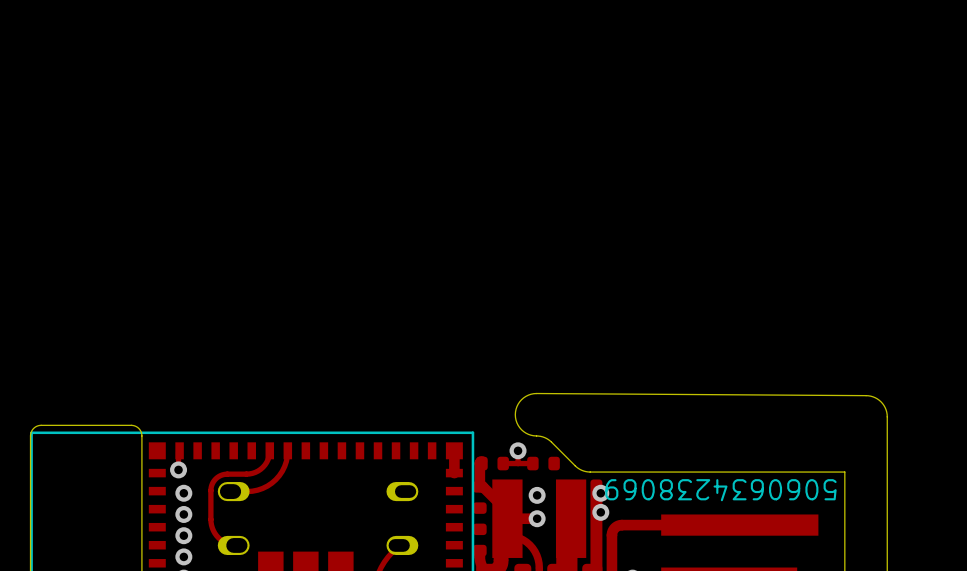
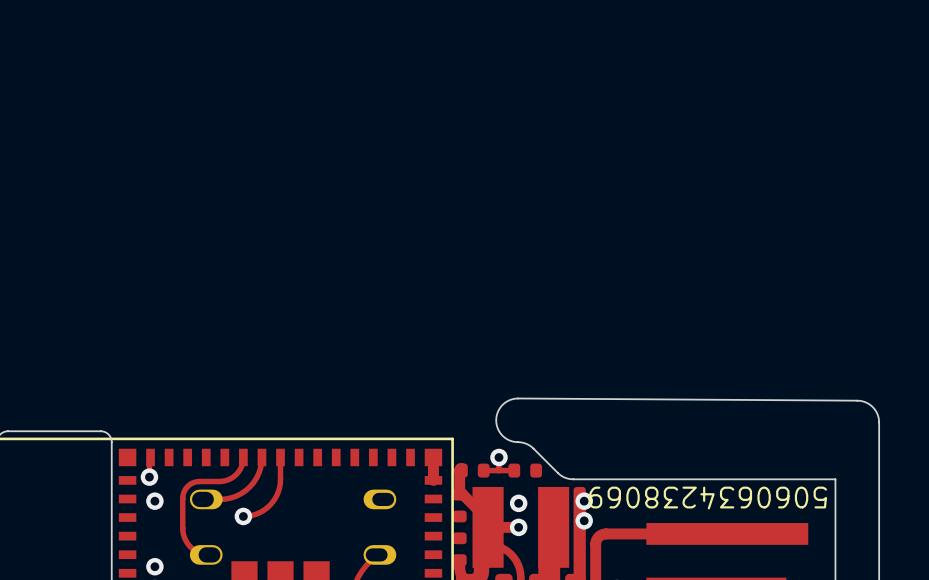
track: none -> (280, 457) (280, 483) (274, 499) (259, 512) (243, 516)
via: none -> (243, 516)
via: (183, 514) -> none
via: (183, 535) -> none

